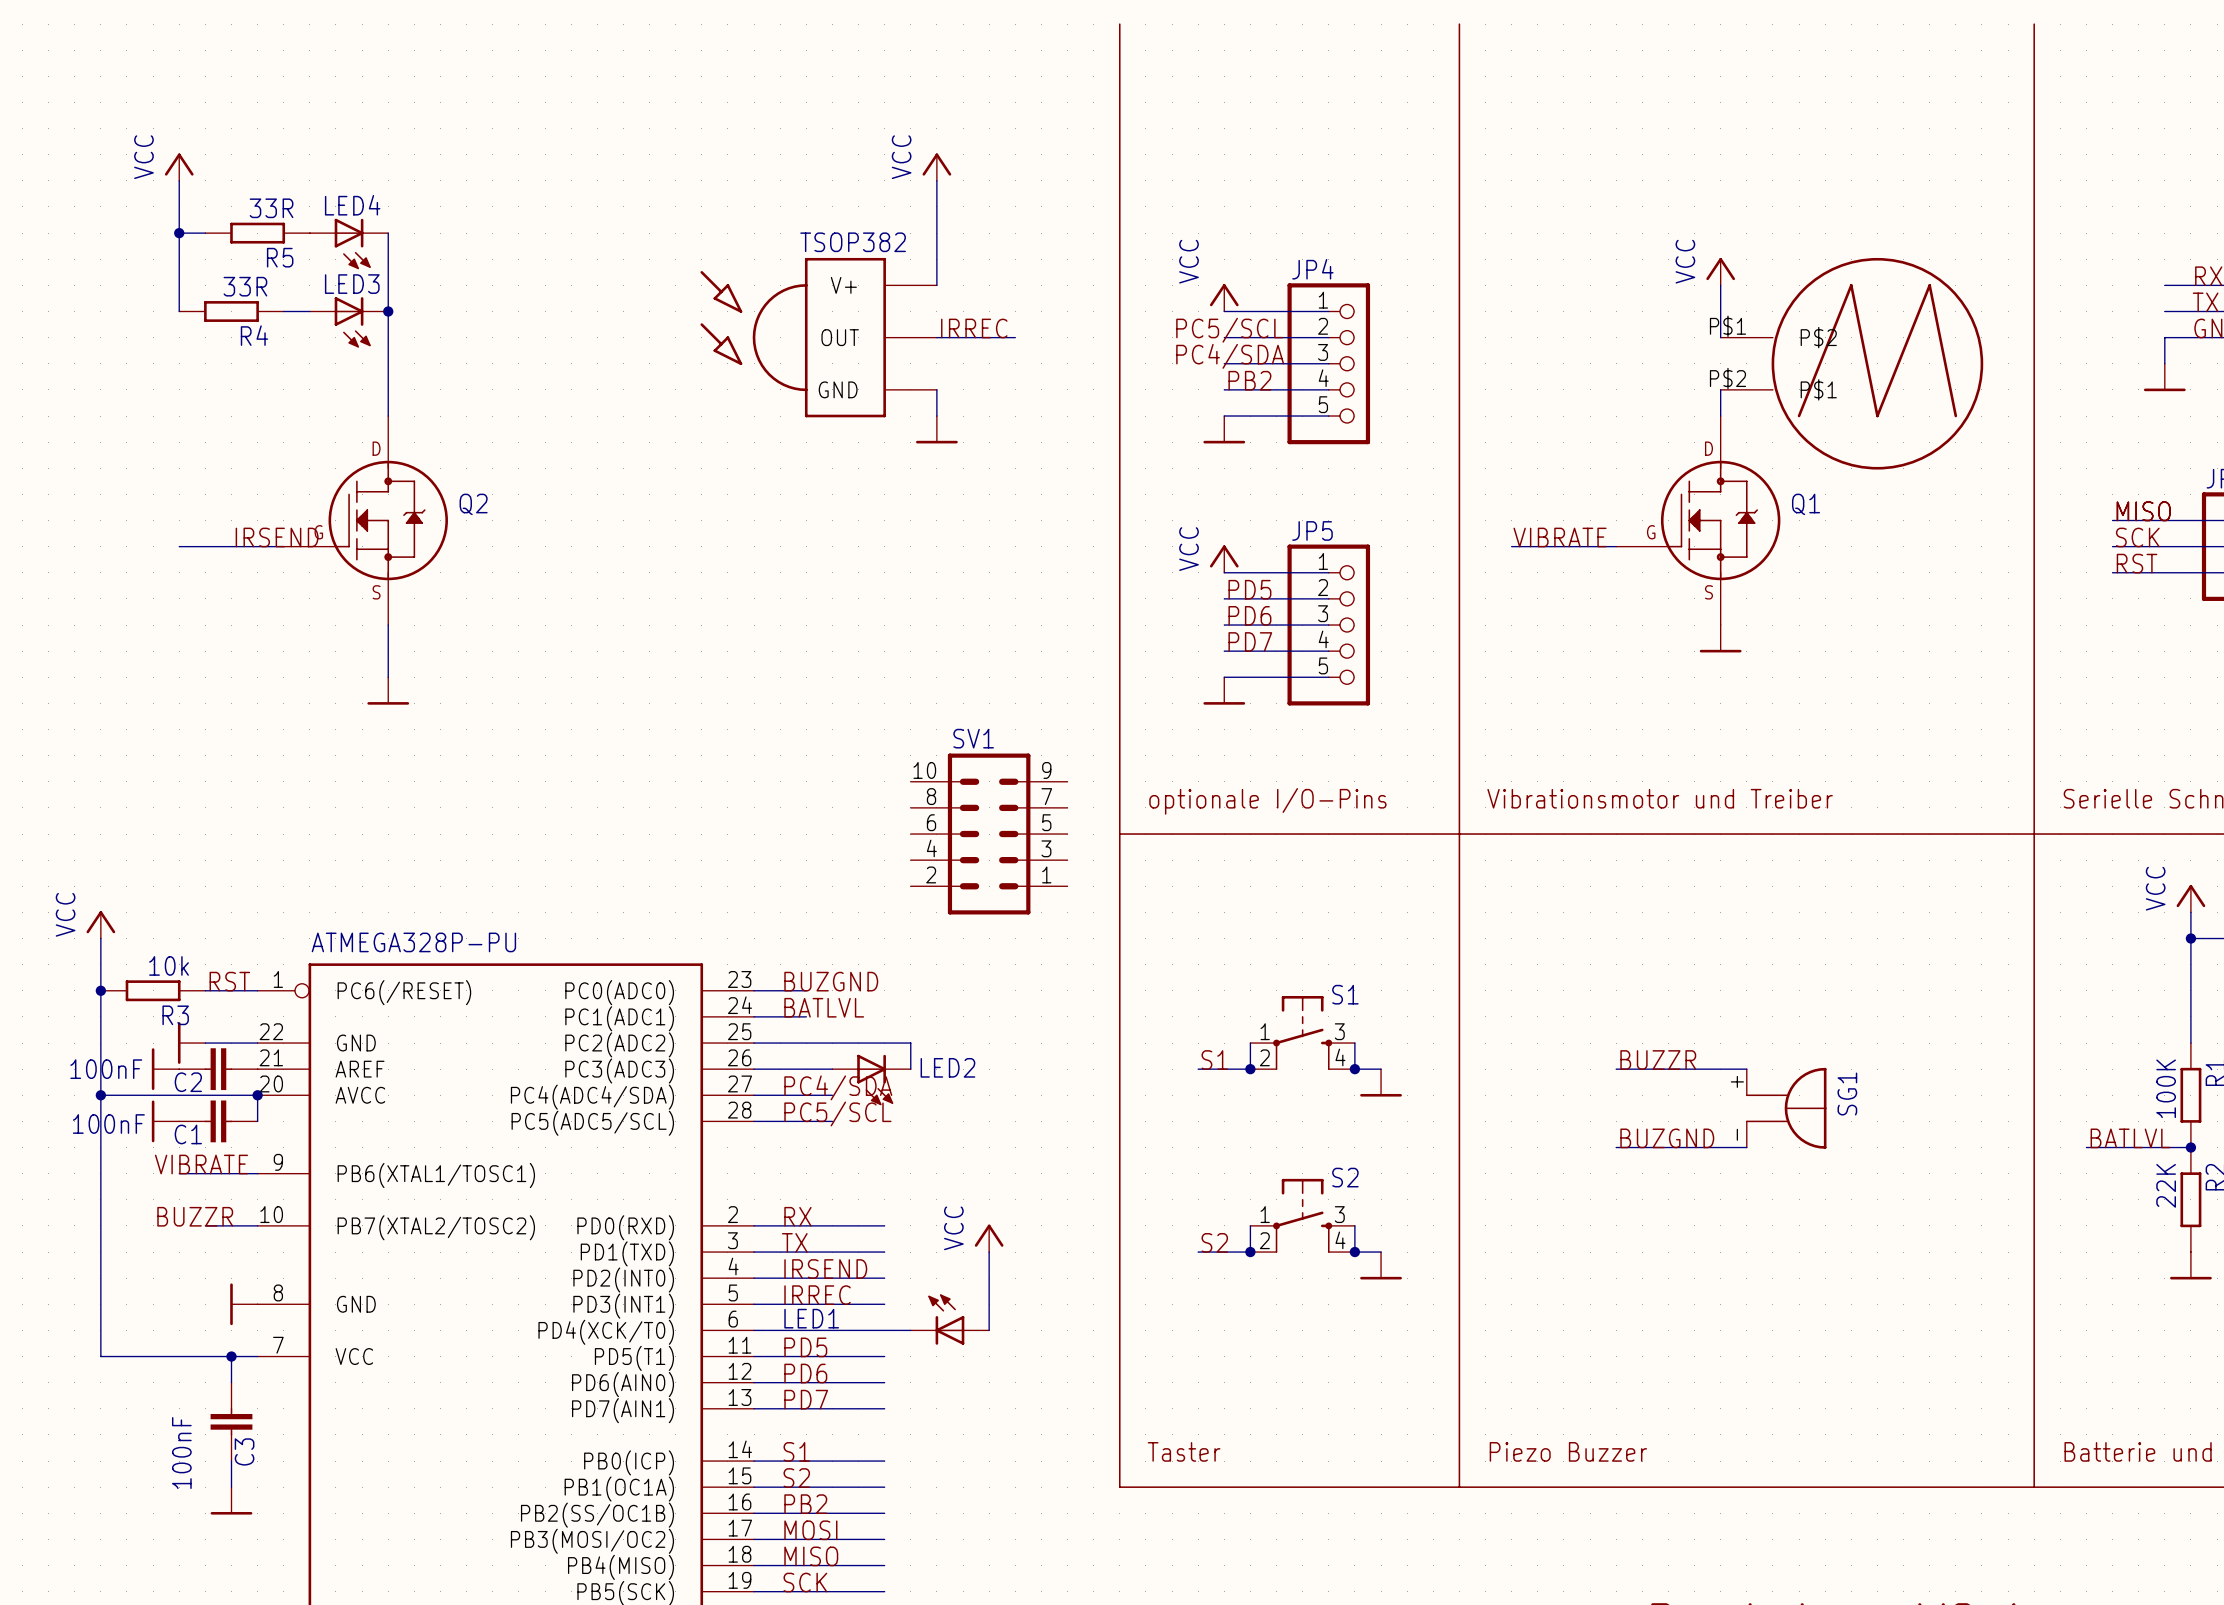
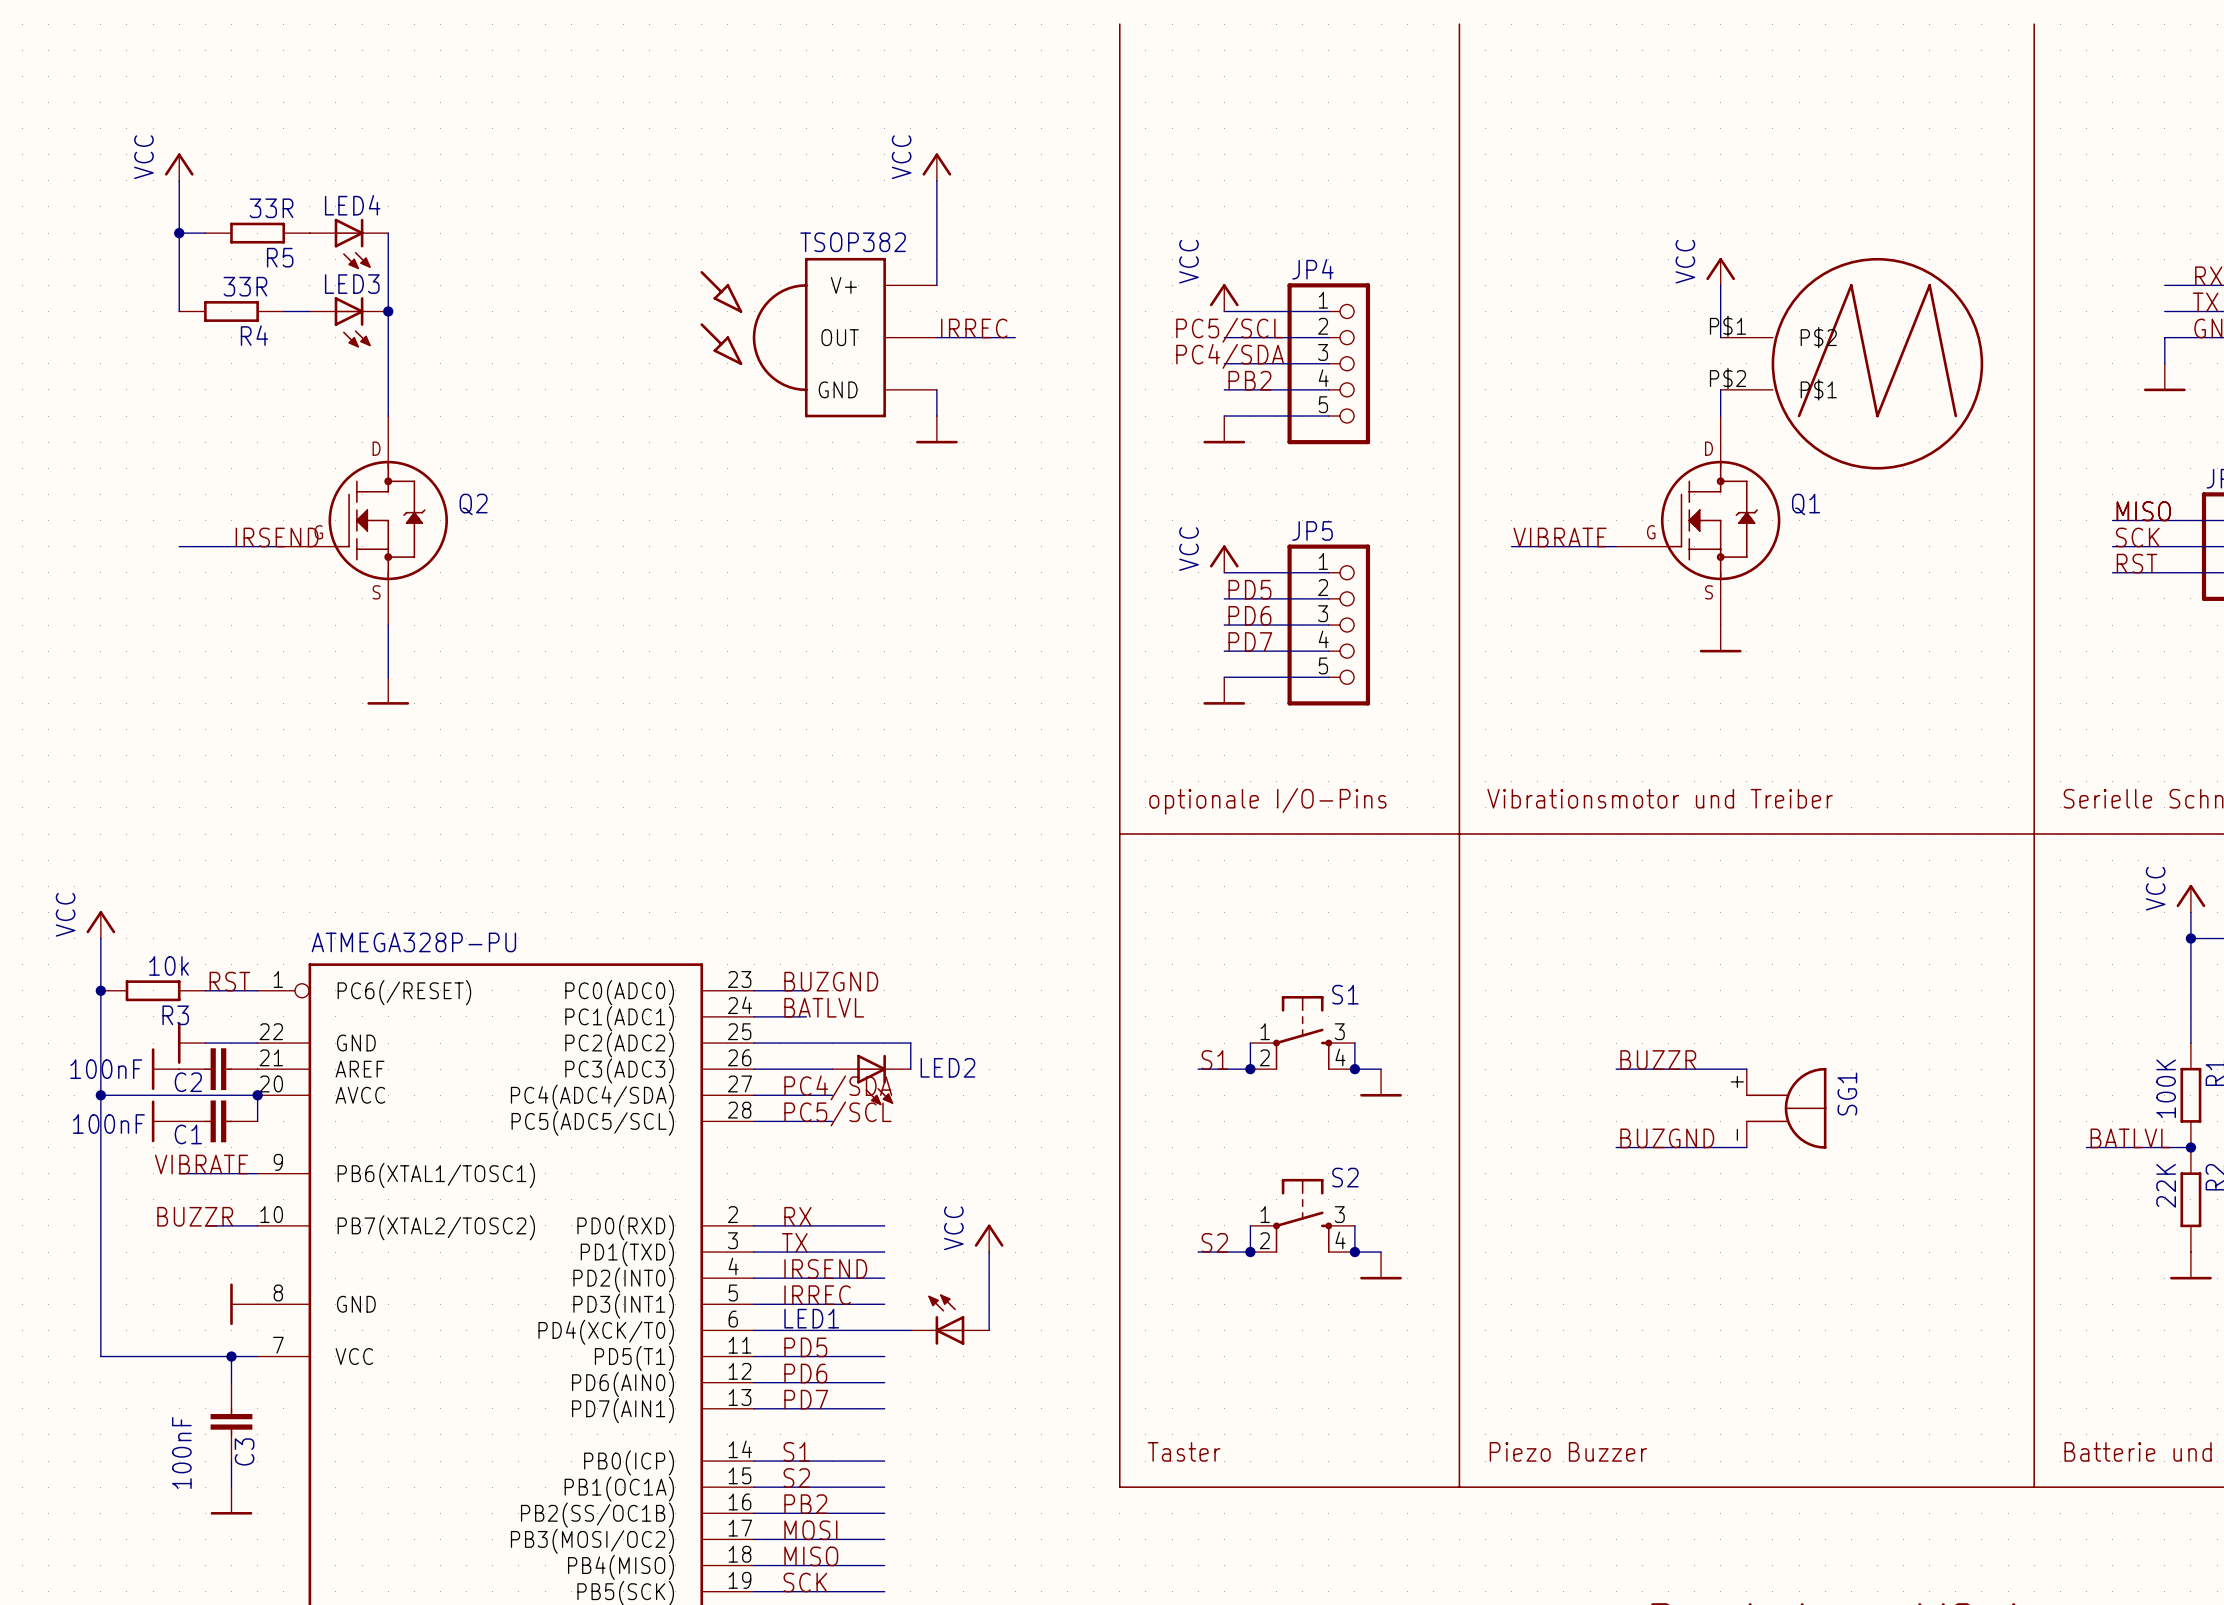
SV1: (989, 834) -> none

